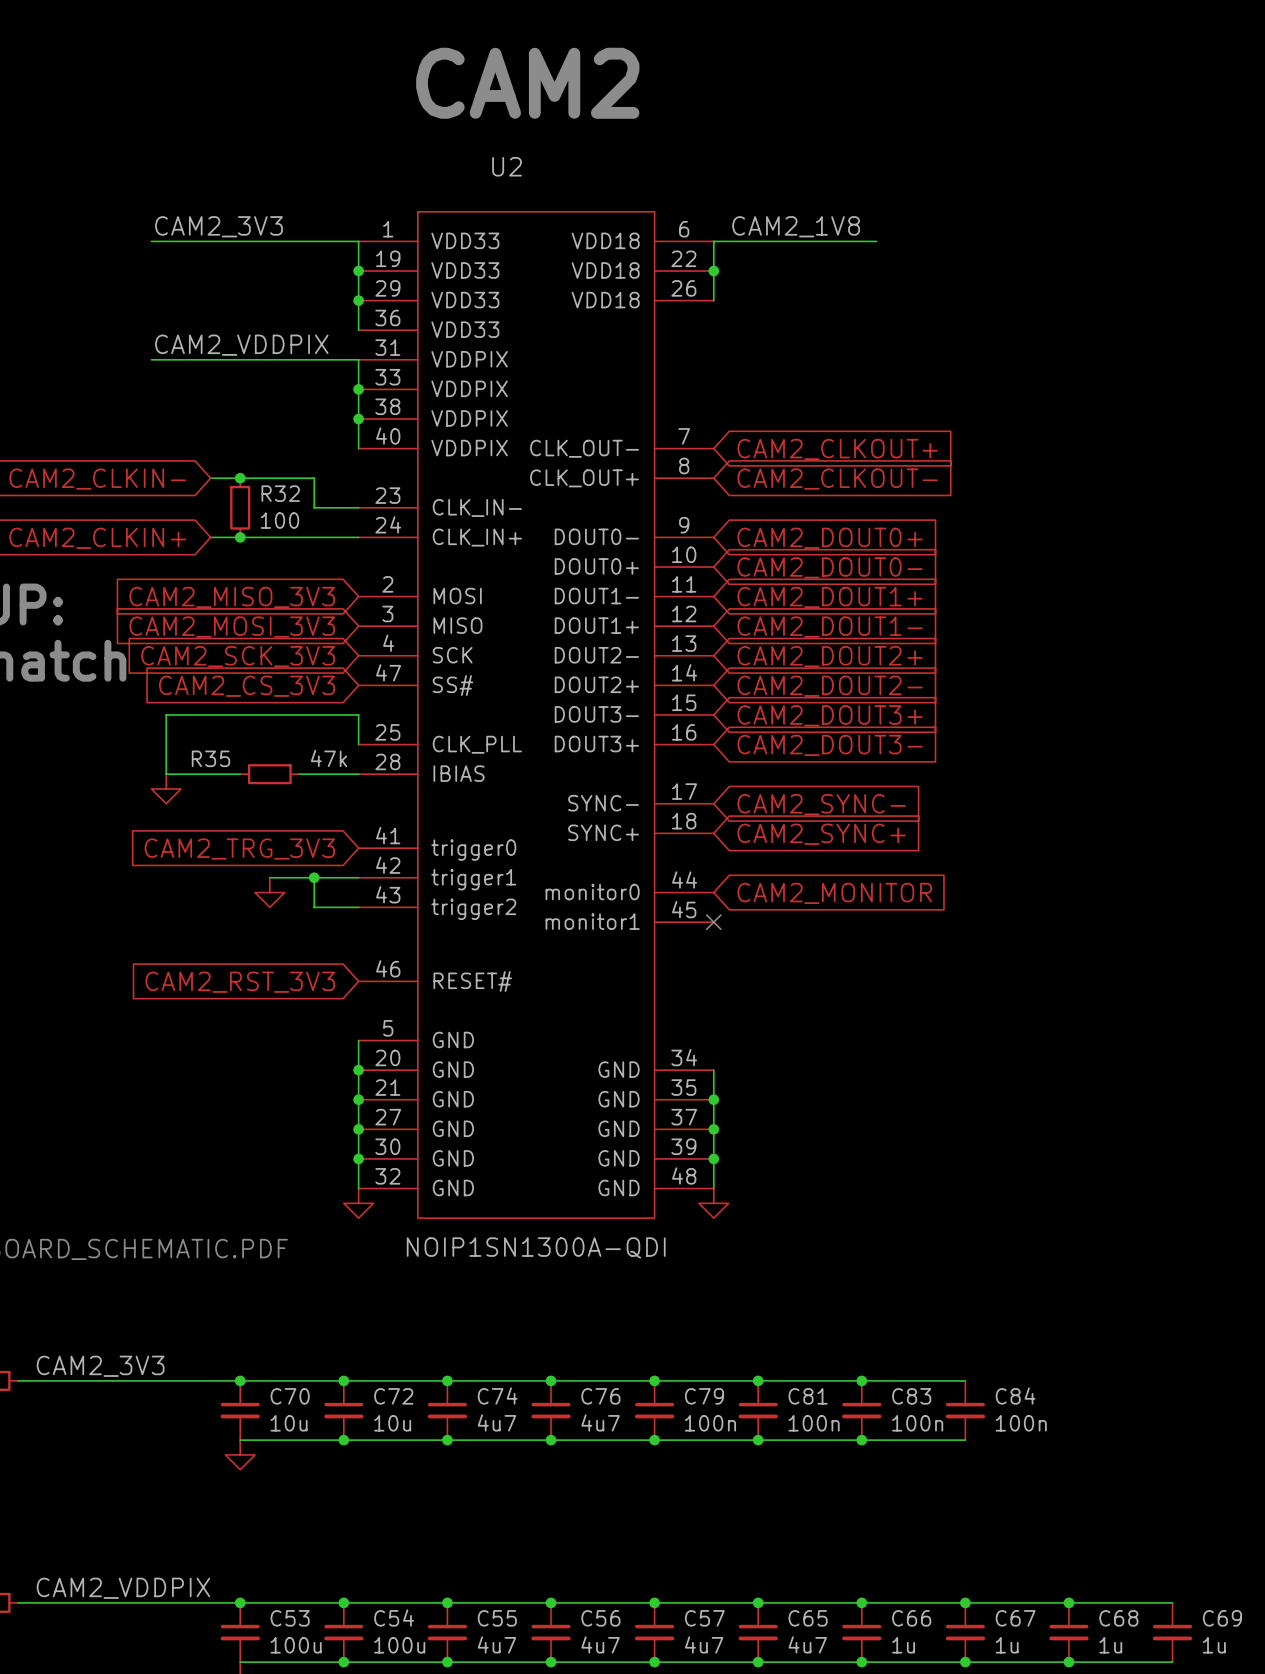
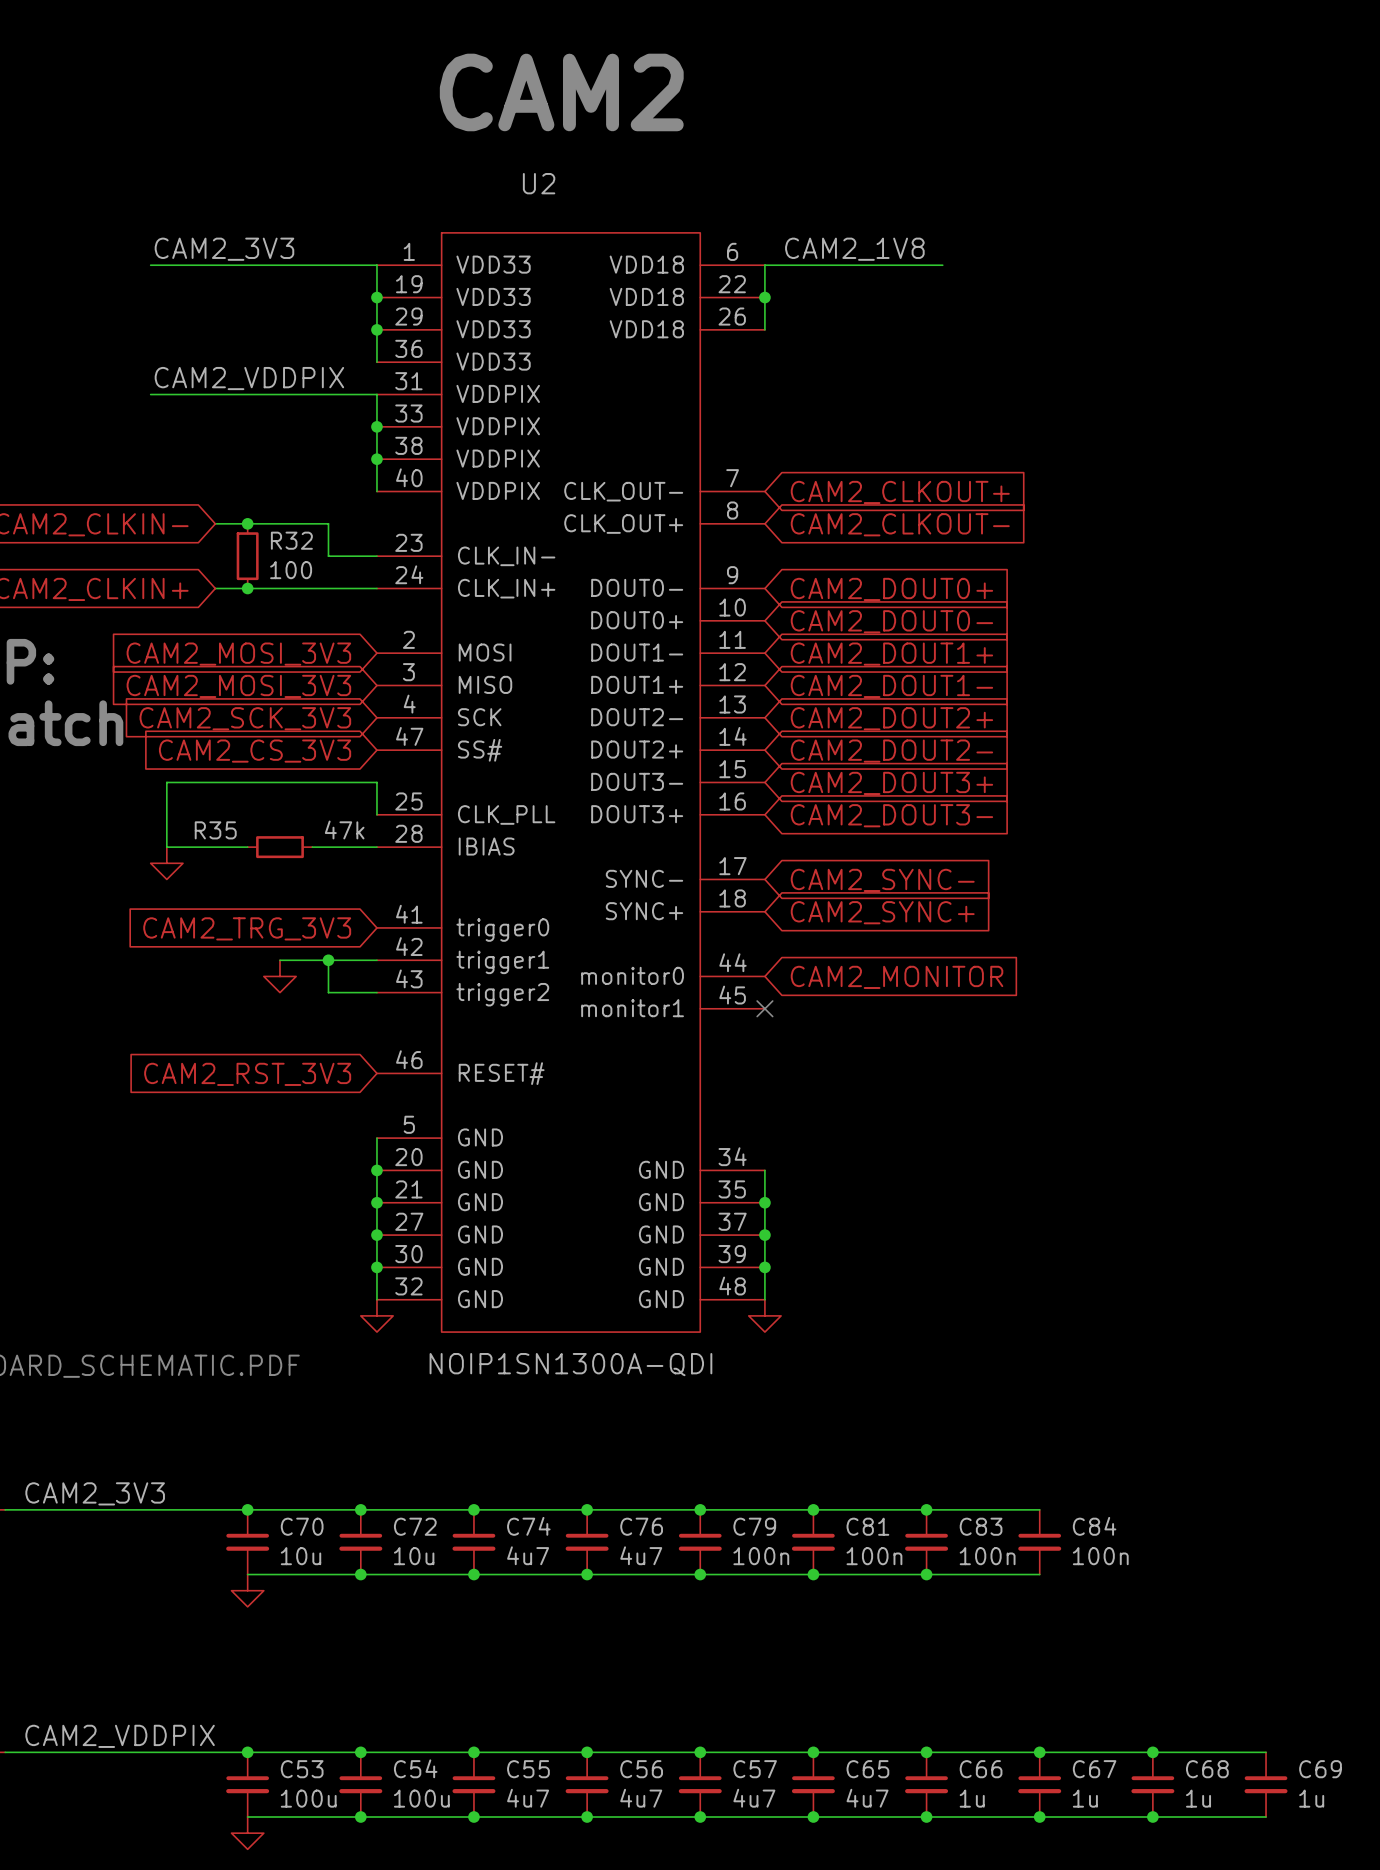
global label: CAM2_MISO_3V3 (232, 597) -> CAM2_MOSI_3V3 (238, 654)

